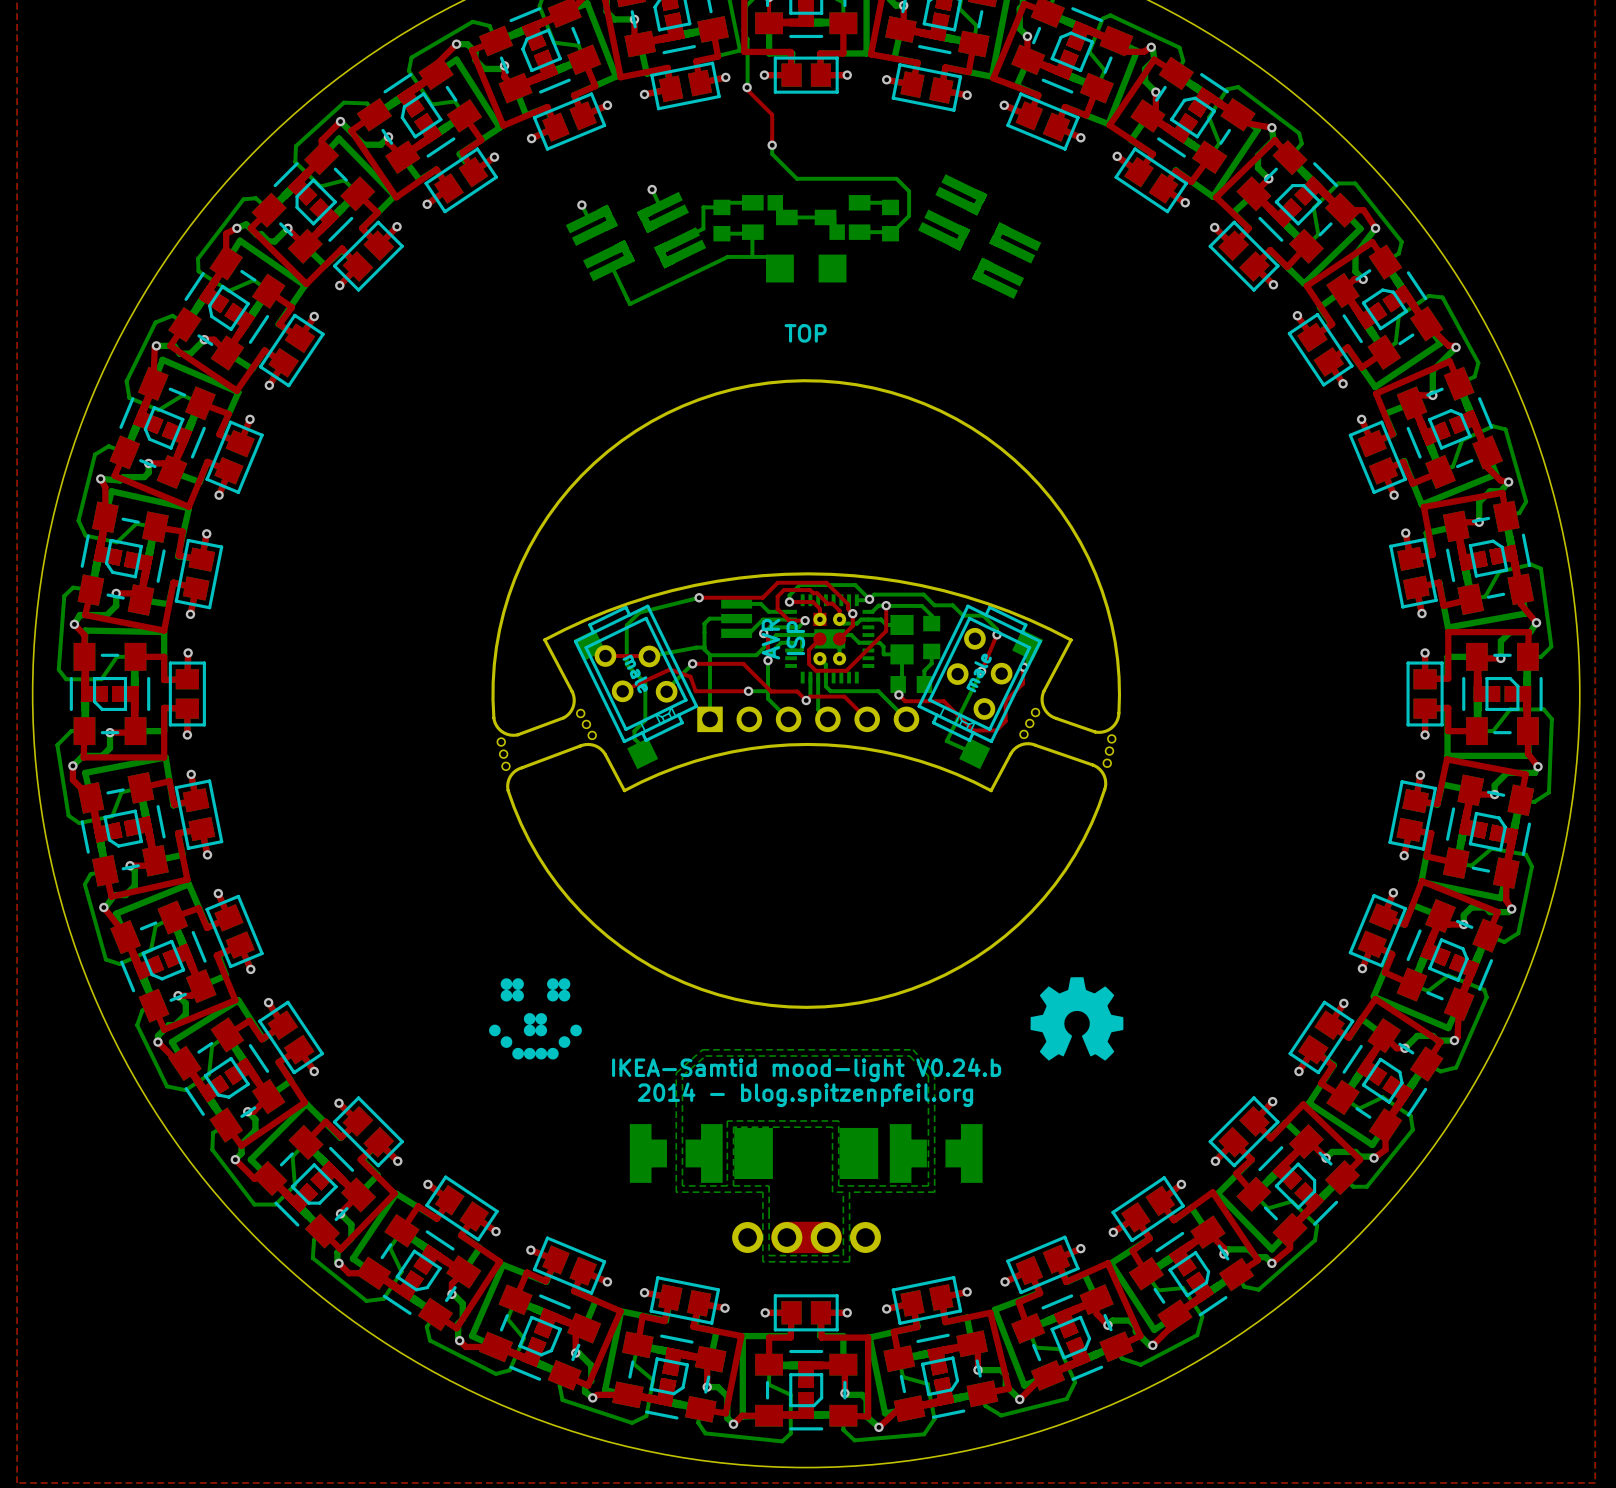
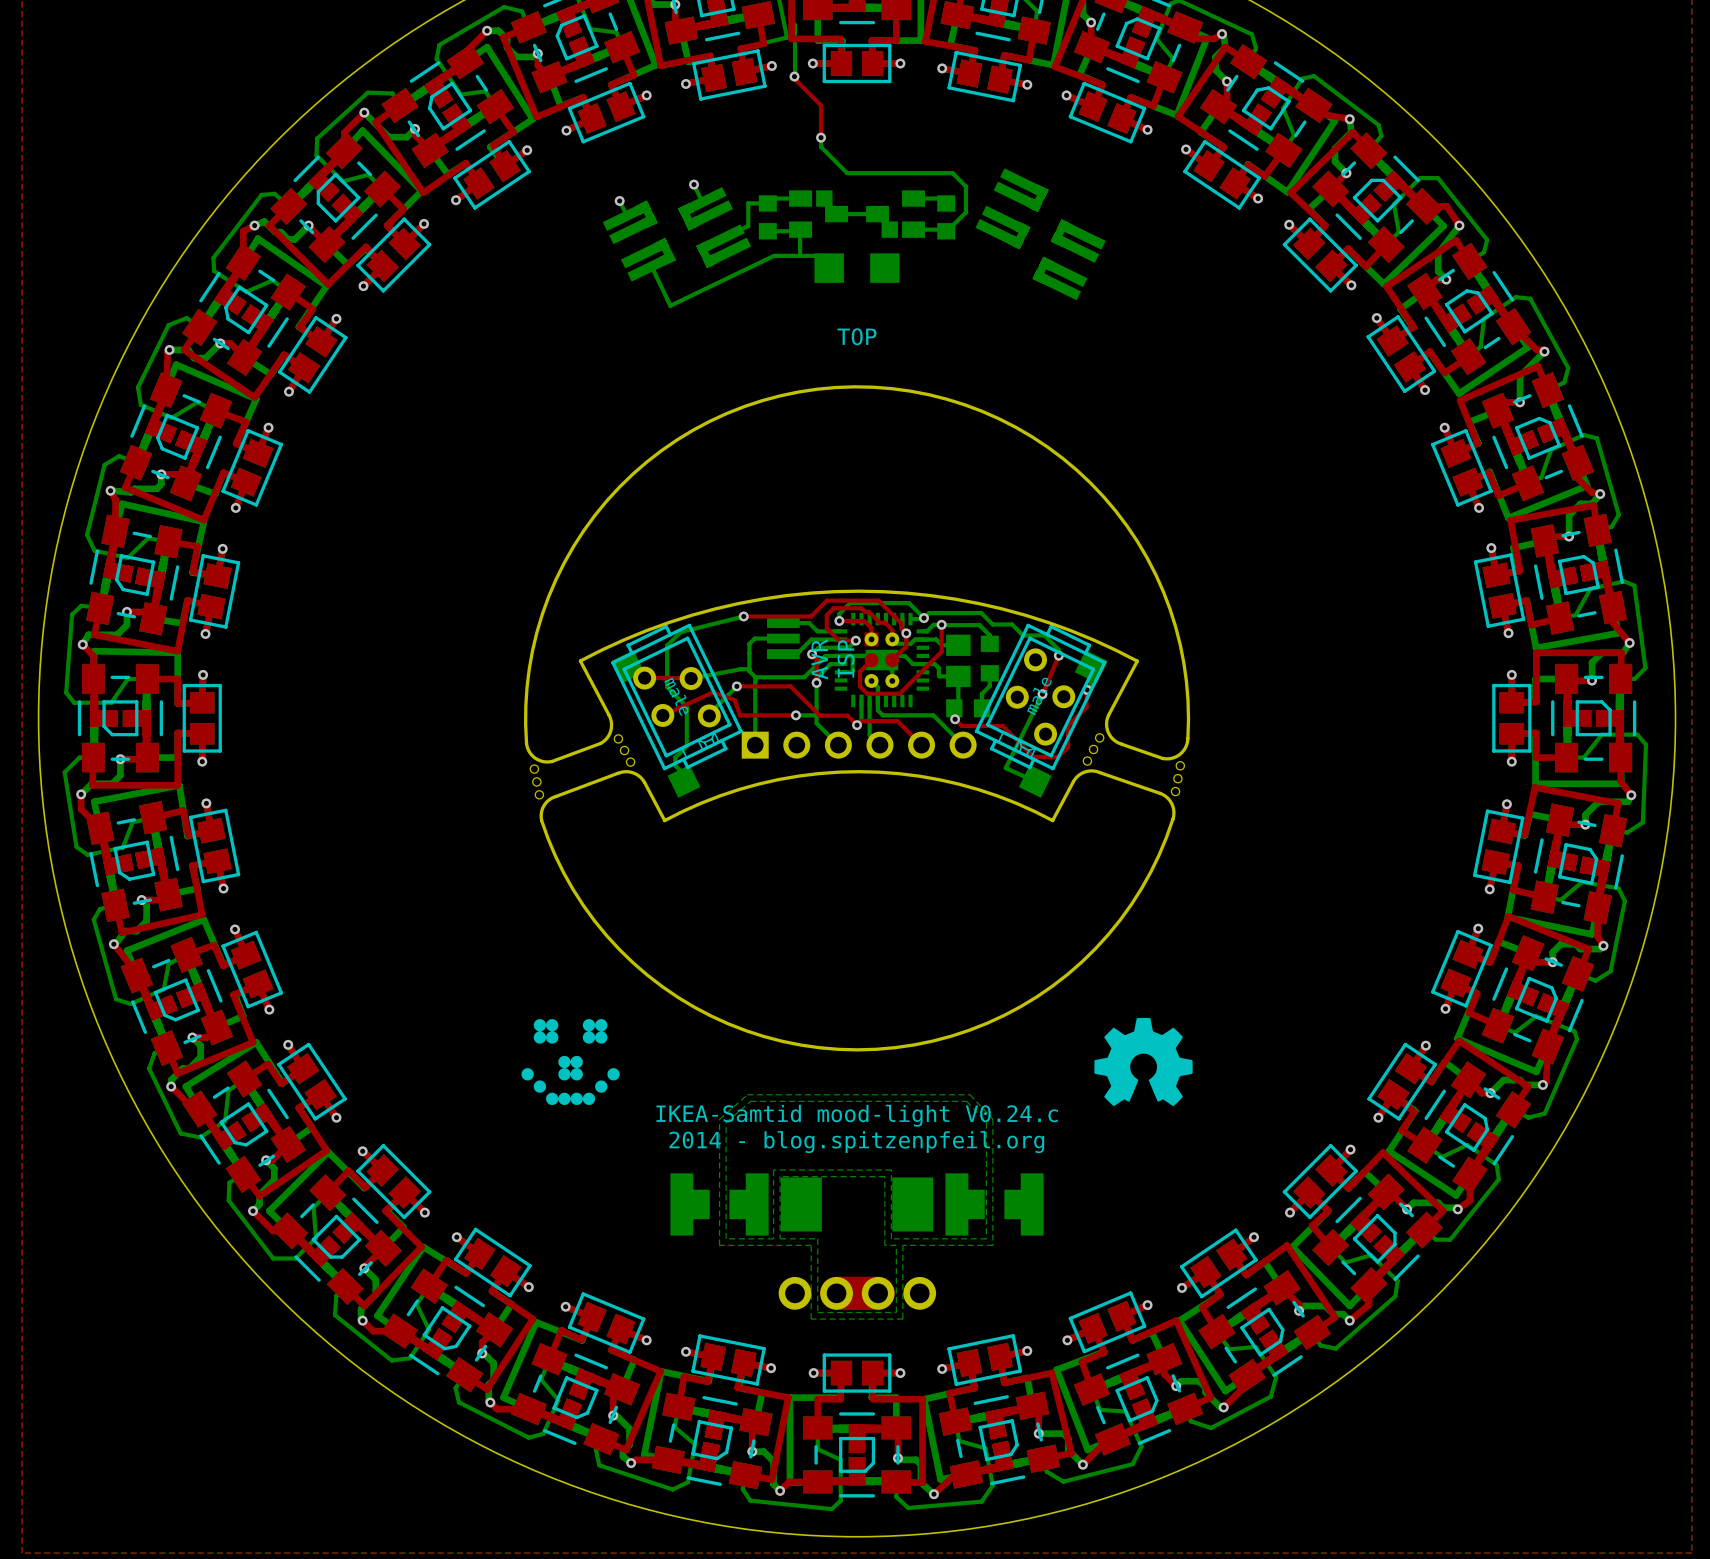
text: IKEA-Samtid mood-light V0.24.b (806, 1069) -> IKEA-Samtid mood-light V0.24.c (857, 1115)

